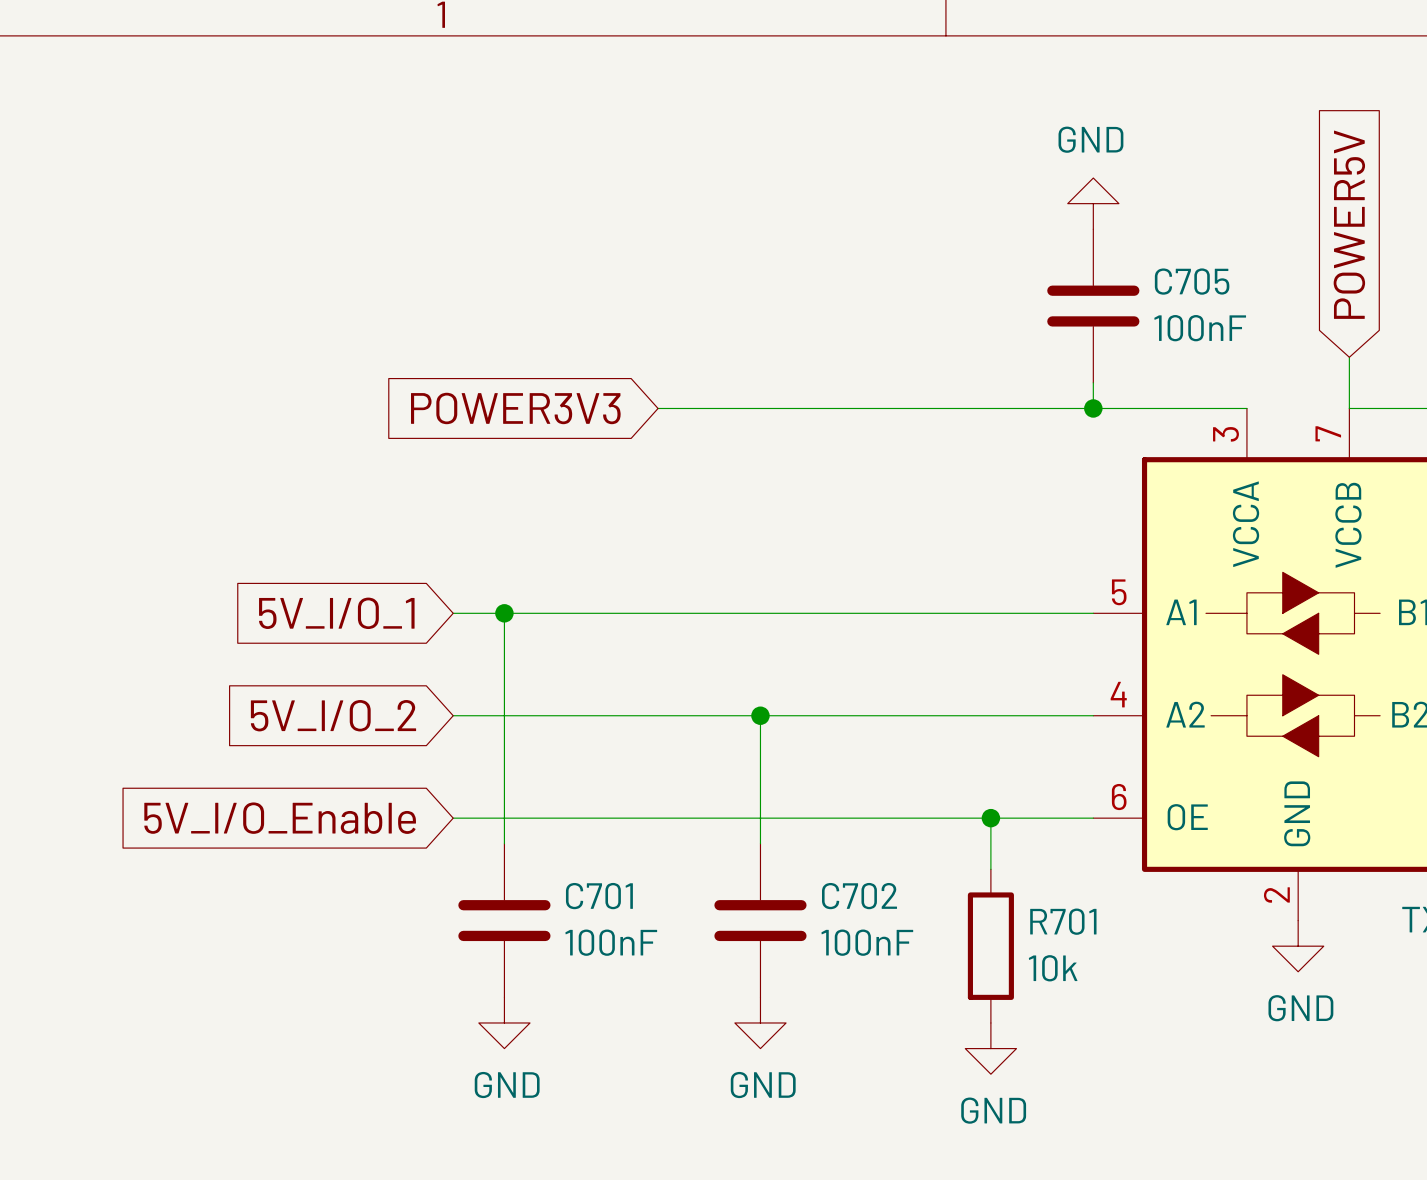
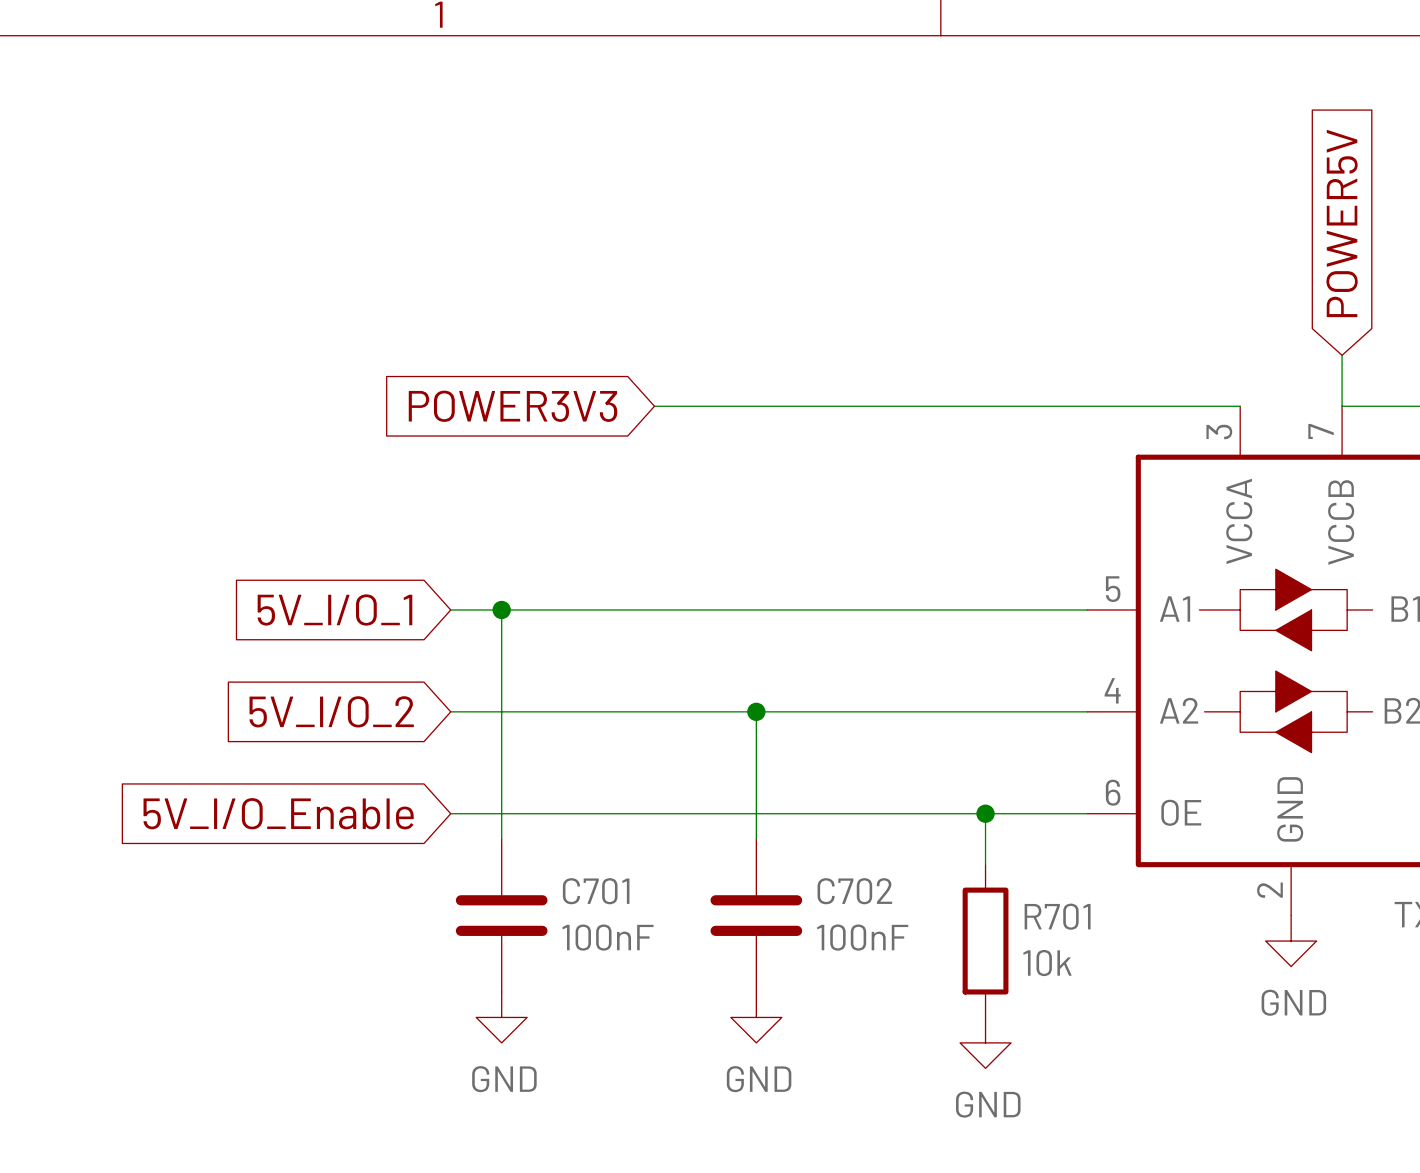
power symbol: GND (1093, 203) -> none
C705: 100nF (1093, 306) -> none
wire: (1093, 382) (1093, 408) -> none
junction: (1093, 408) -> none

